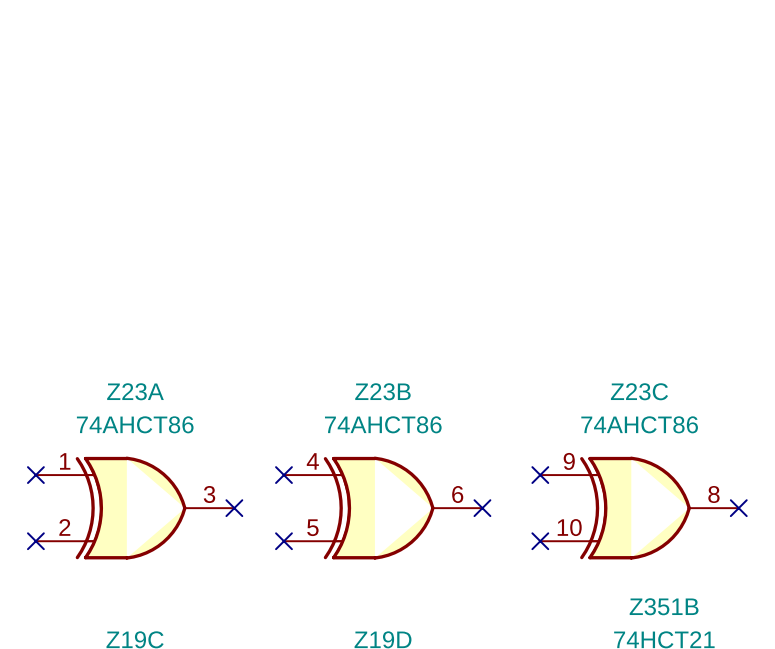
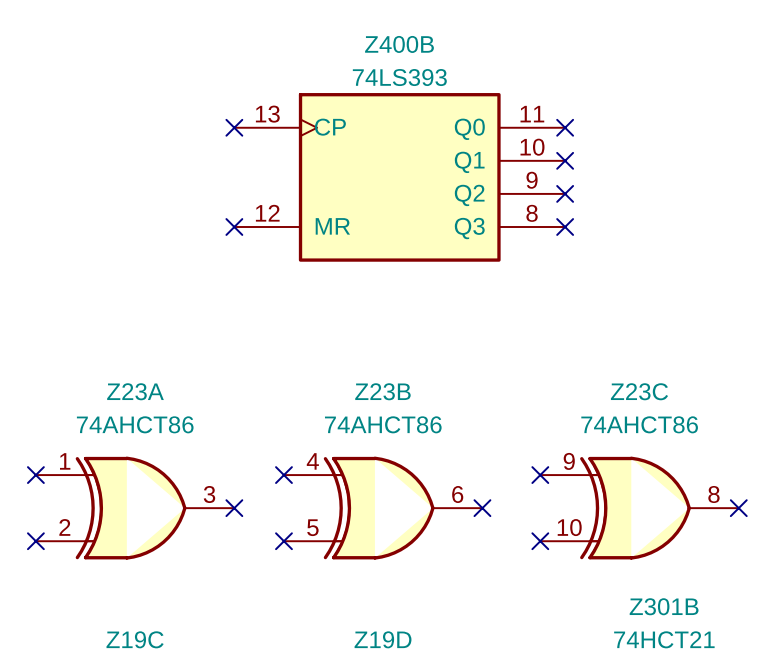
no-connect mark: none -> (234, 127)
no-connect mark: none -> (565, 127)
no-connect mark: none -> (565, 160)
Z400B: none -> 74LS393 (399, 177)
no-connect mark: none -> (565, 193)
no-connect mark: none -> (234, 226)
no-connect mark: none -> (565, 226)
Z351B name: Z351B (664, 606) -> Z301B (664, 606)

